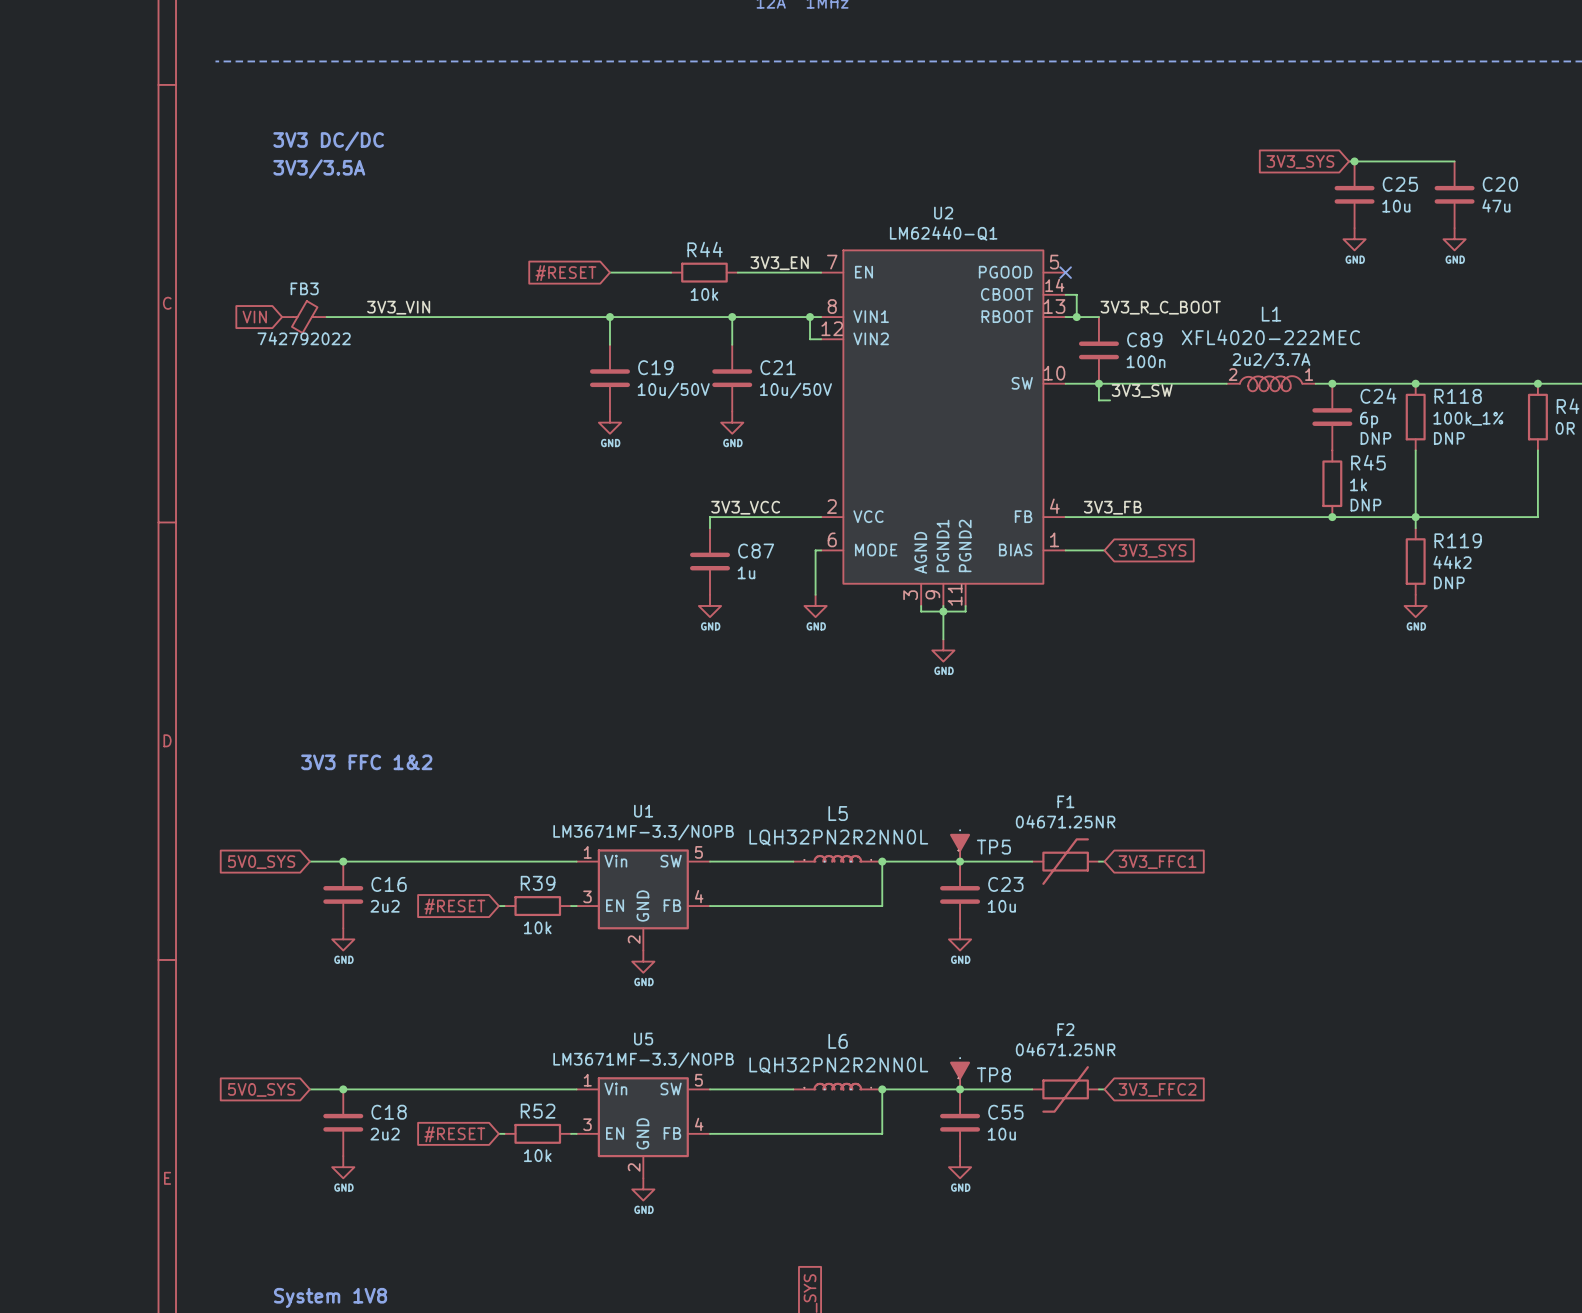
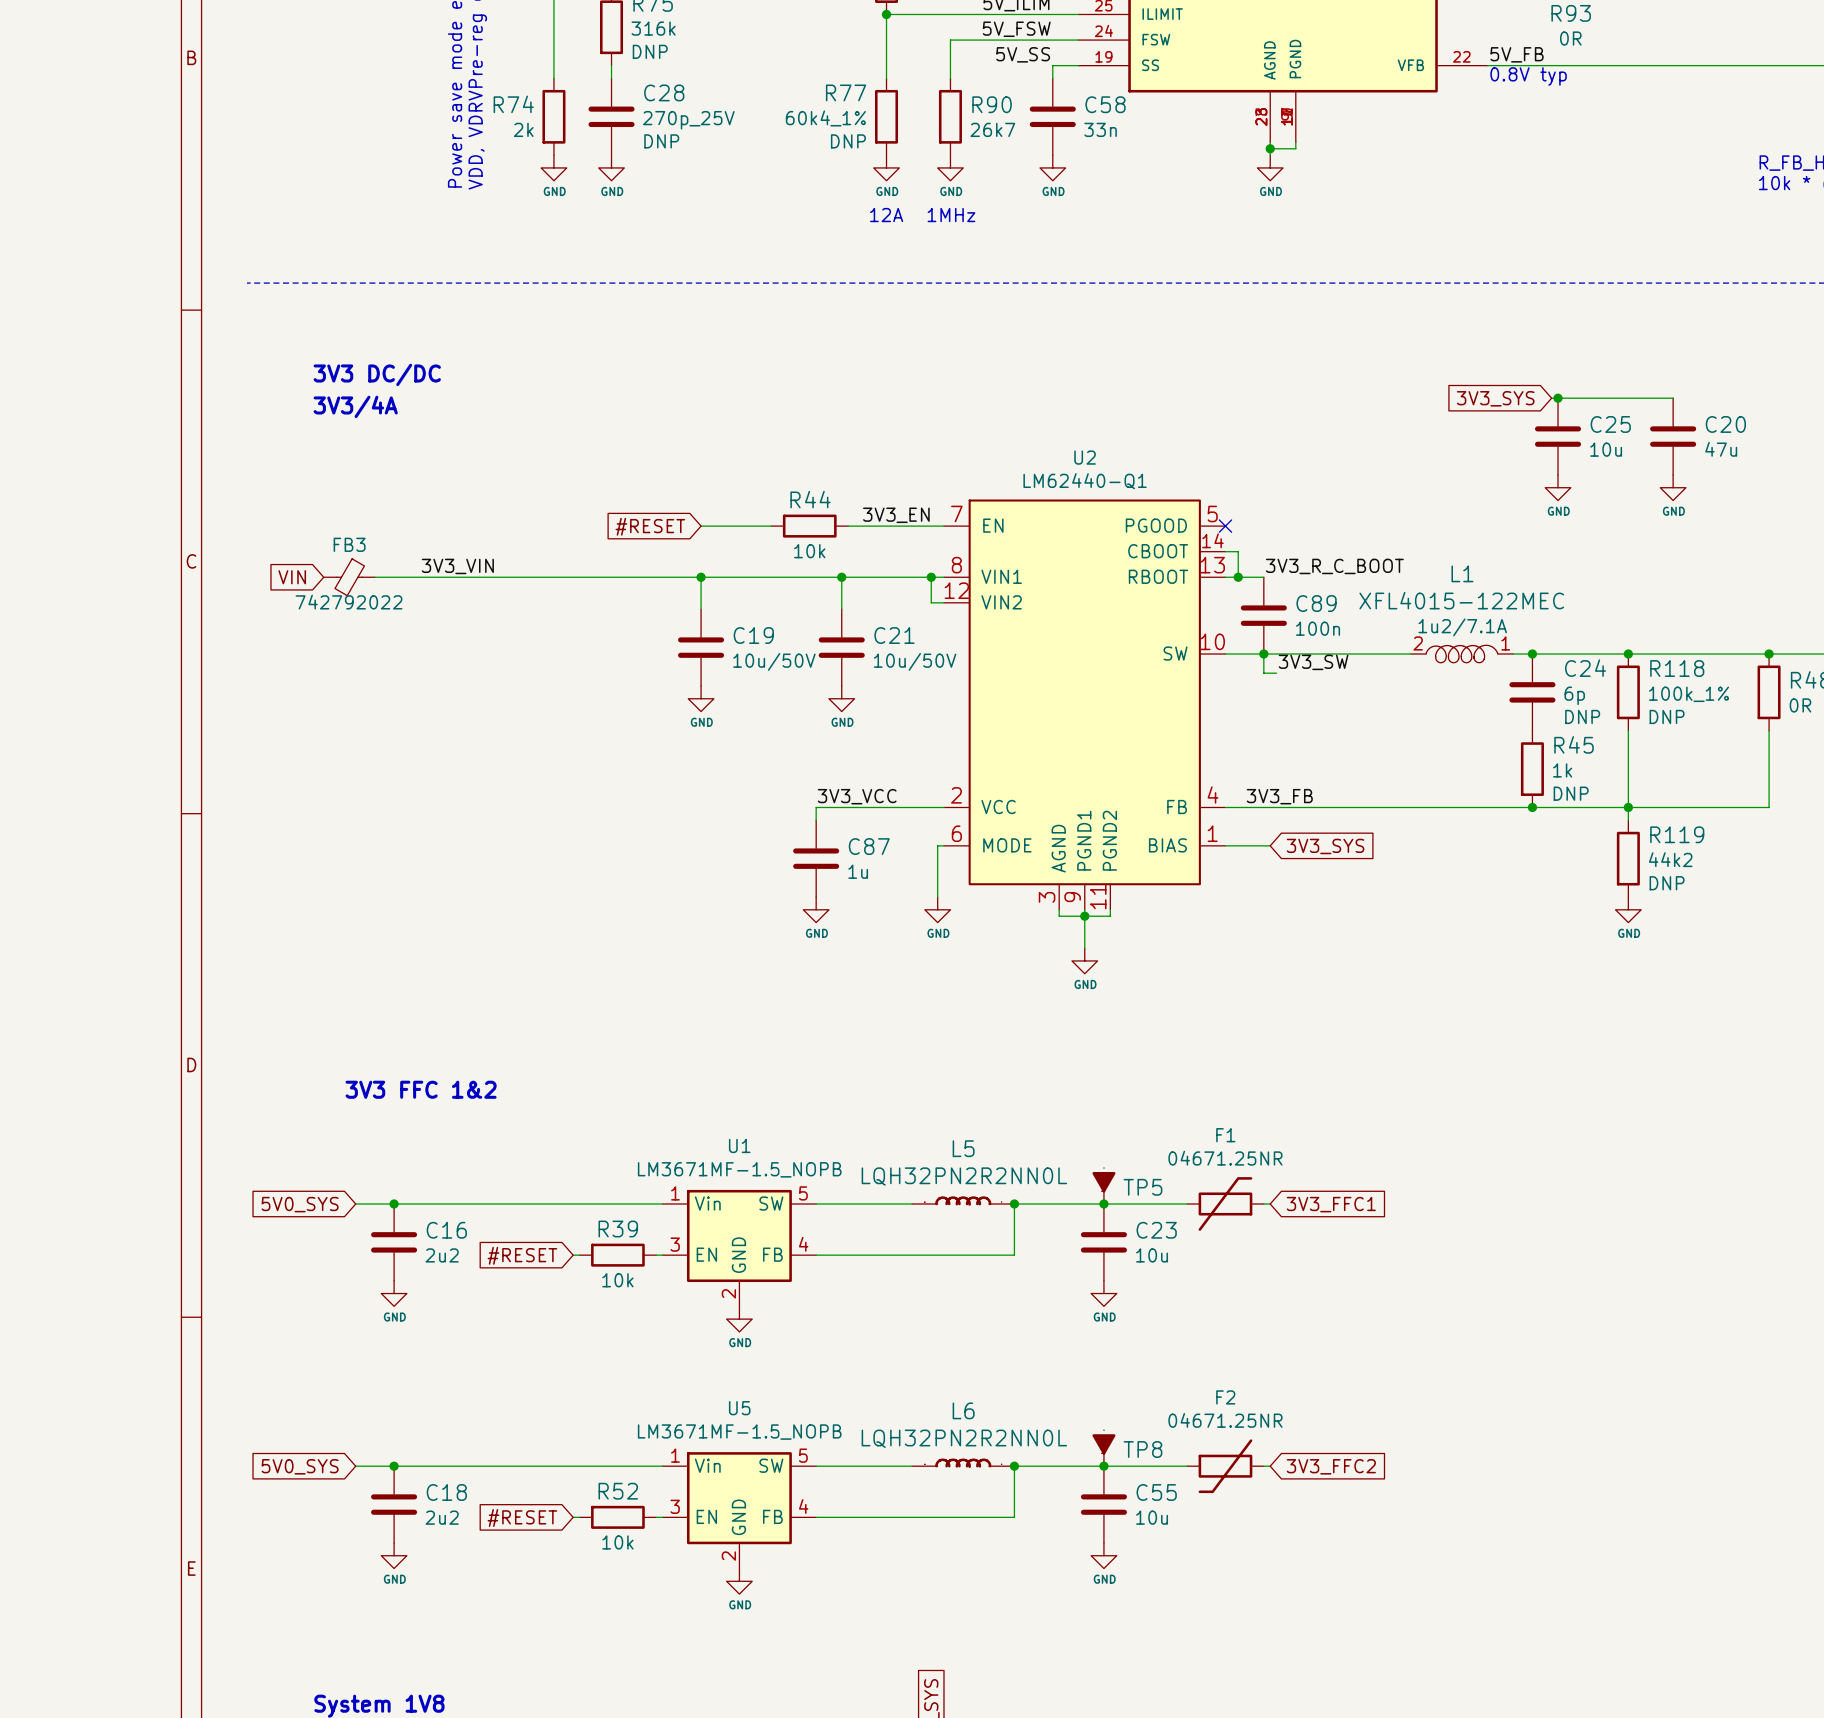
text: 3V3/3.5A (319, 169) -> 3V3/4A (355, 406)
L1 value: XFL4020-222MEC (1270, 337) -> XFL4015-122MEC (1461, 600)
L1 text: 2u2/3.7A (1271, 360) -> 1u2/7.1A (1462, 627)
U1 value: LM3671MF-3.3/NOPB (643, 832) -> LM3671MF-1.5_NOPB (739, 1169)
U5 value: LM3671MF-3.3/NOPB (643, 1060) -> LM3671MF-1.5_NOPB (739, 1432)

